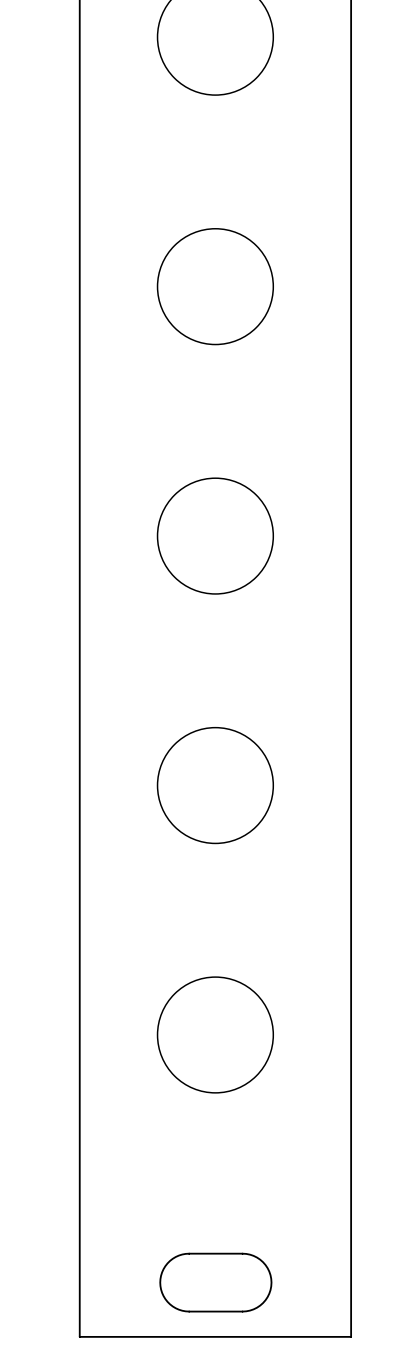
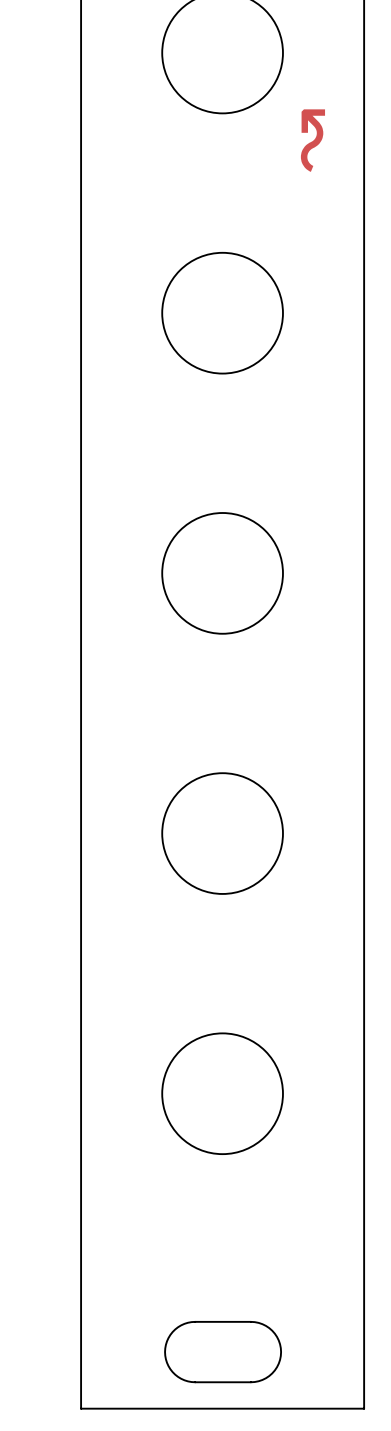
text: none -> ↝ (312, 140)

